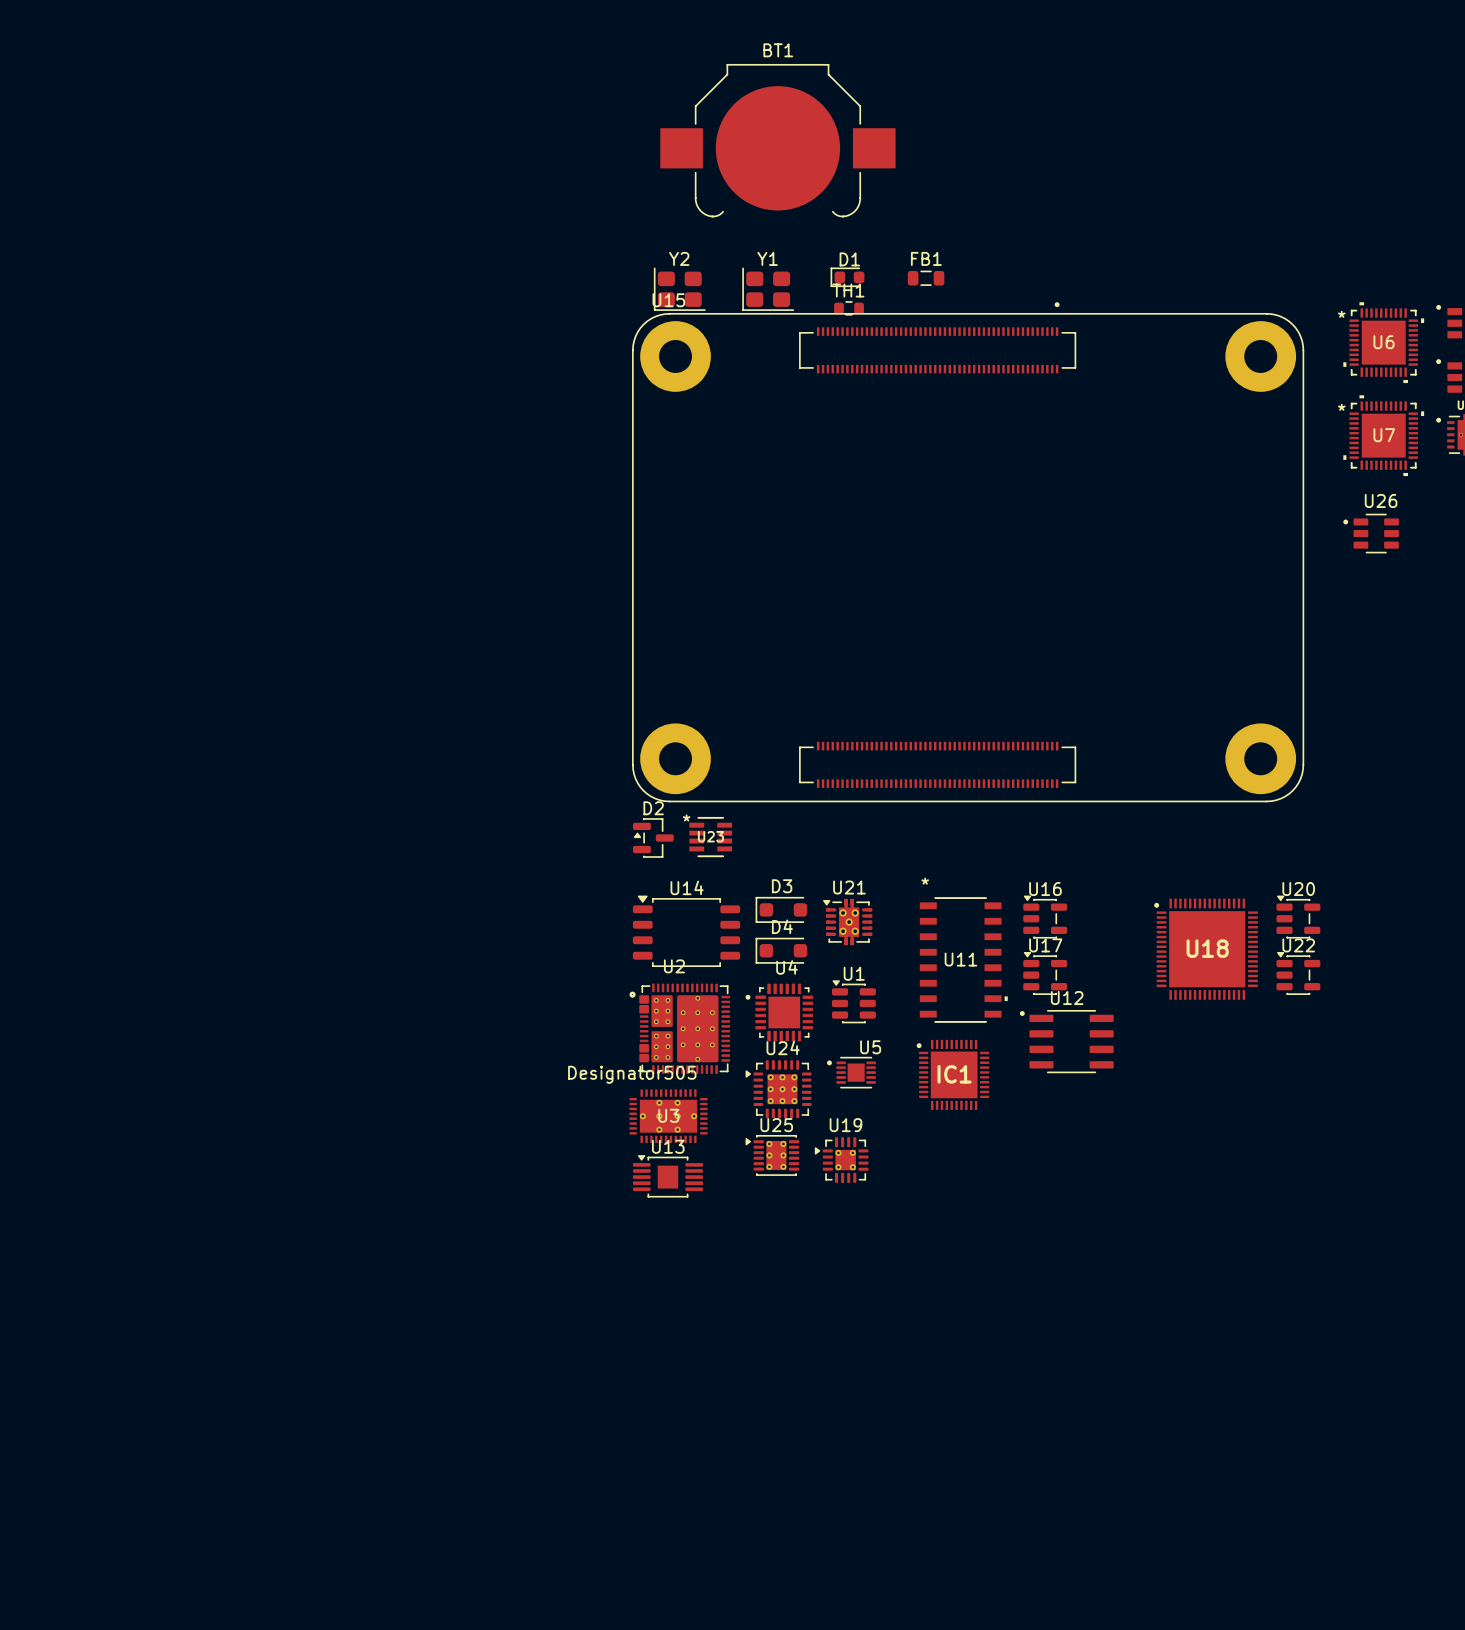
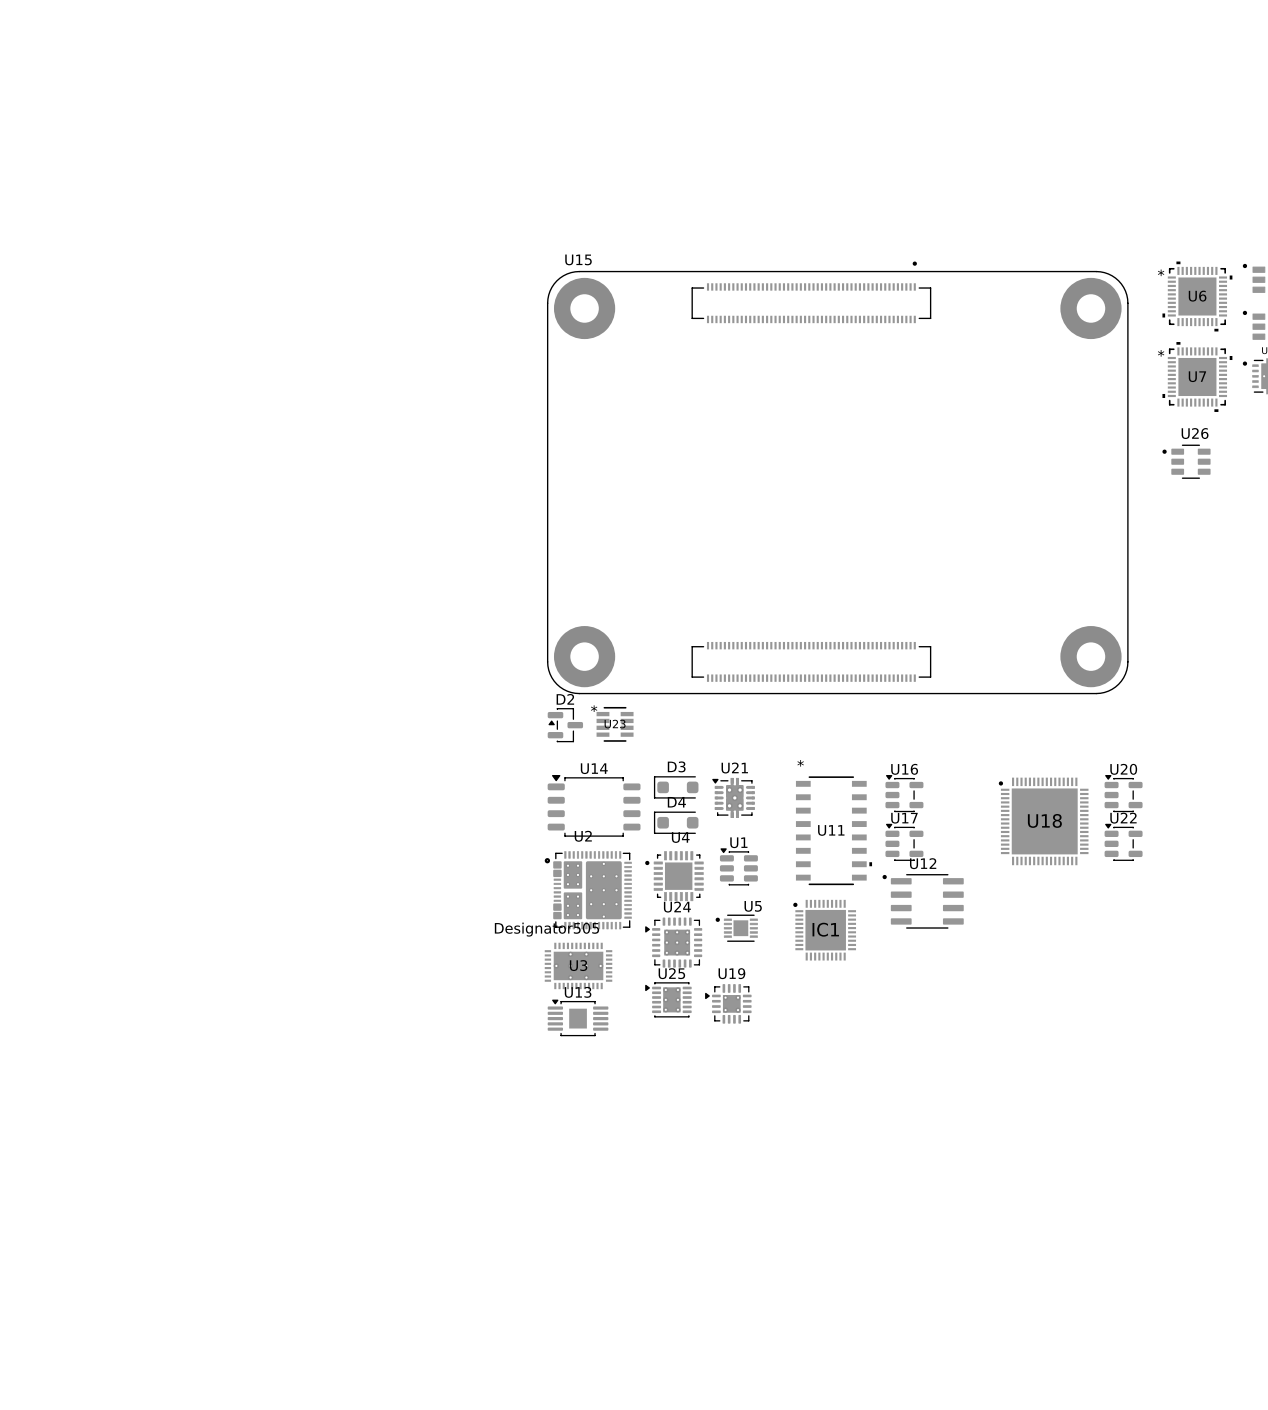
BT1: (777, 140) -> none
D1: (847, 277) -> none
FB1: (926, 278) -> none
Y2: (679, 289) -> none
Y1: (768, 289) -> none
TH1: (849, 308) -> none

